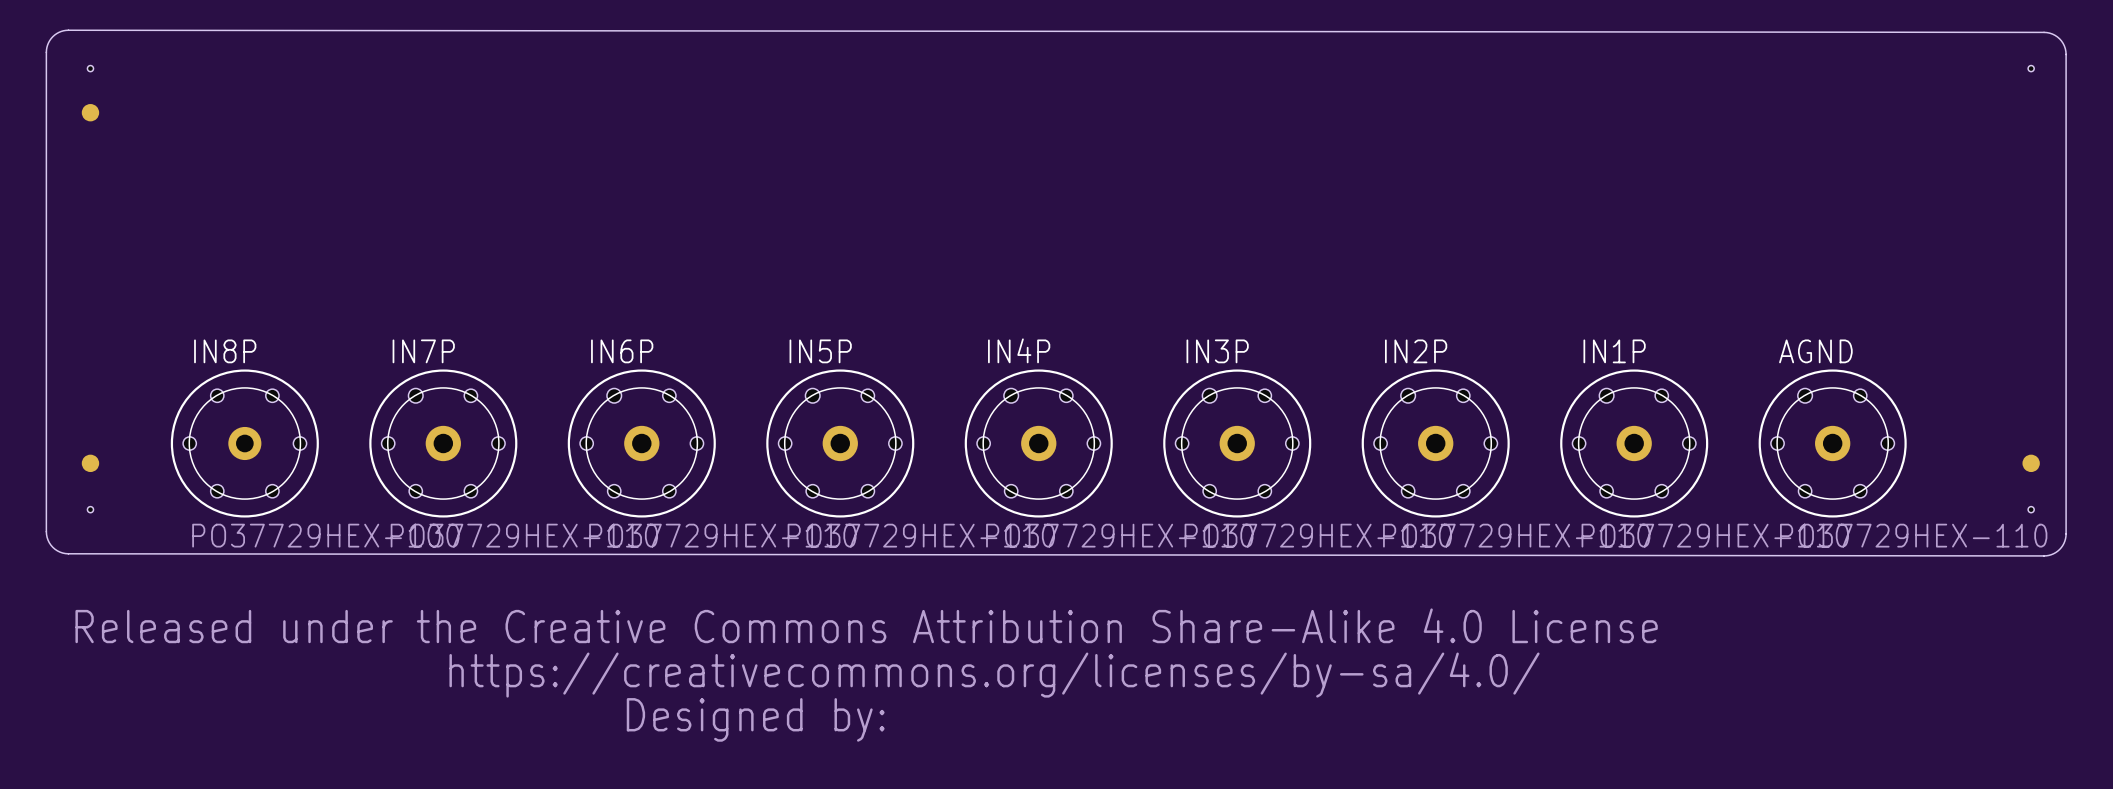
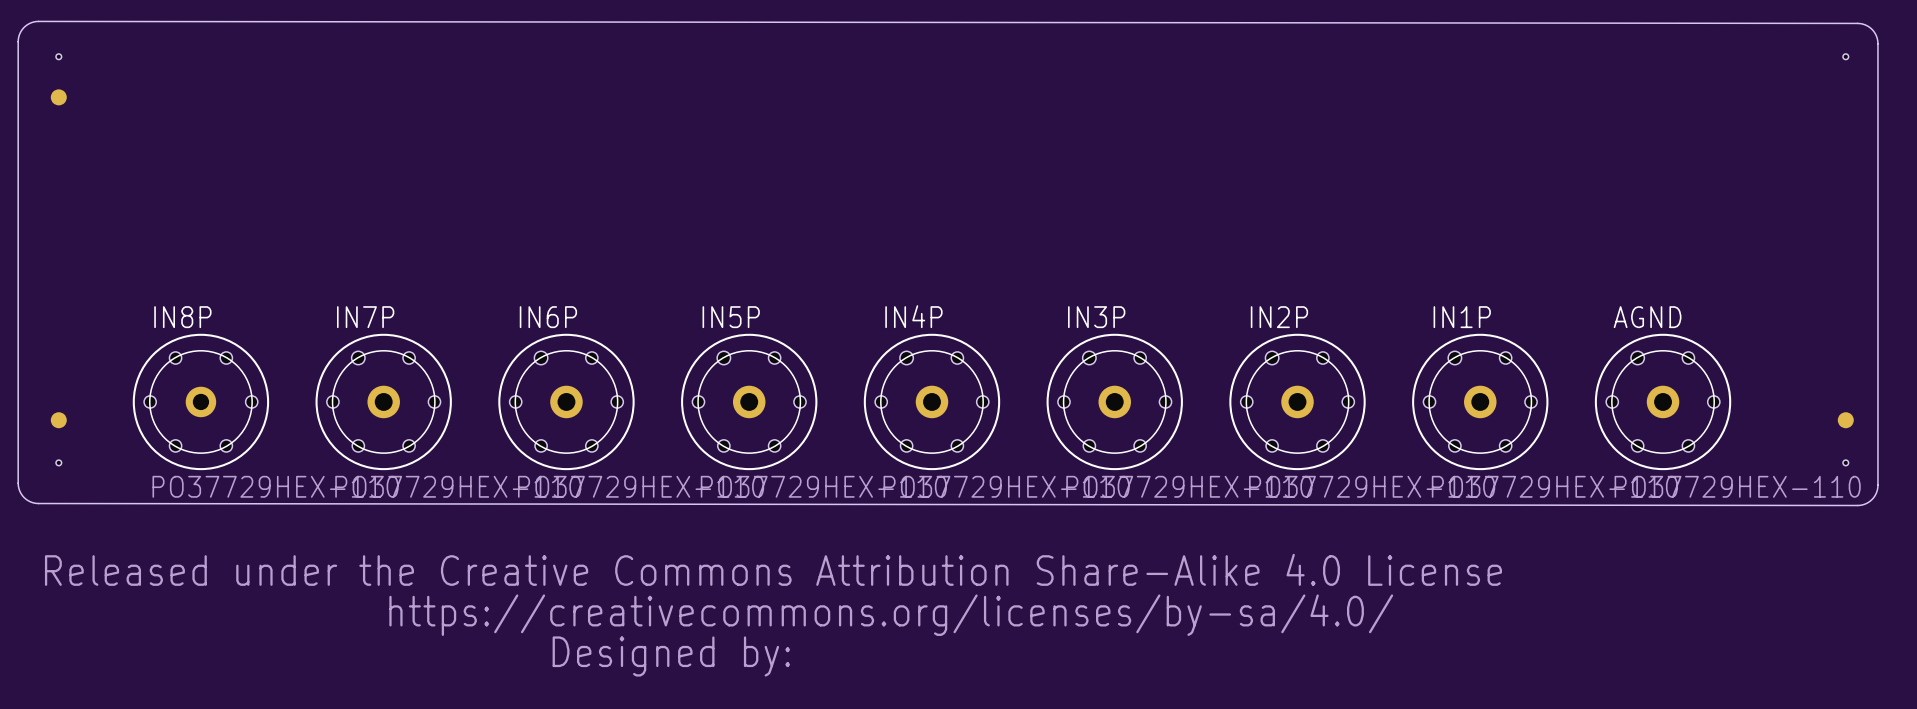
IN8P value: PO37729HEX-100 (325, 535) -> PO37729HEX-110 (275, 486)

